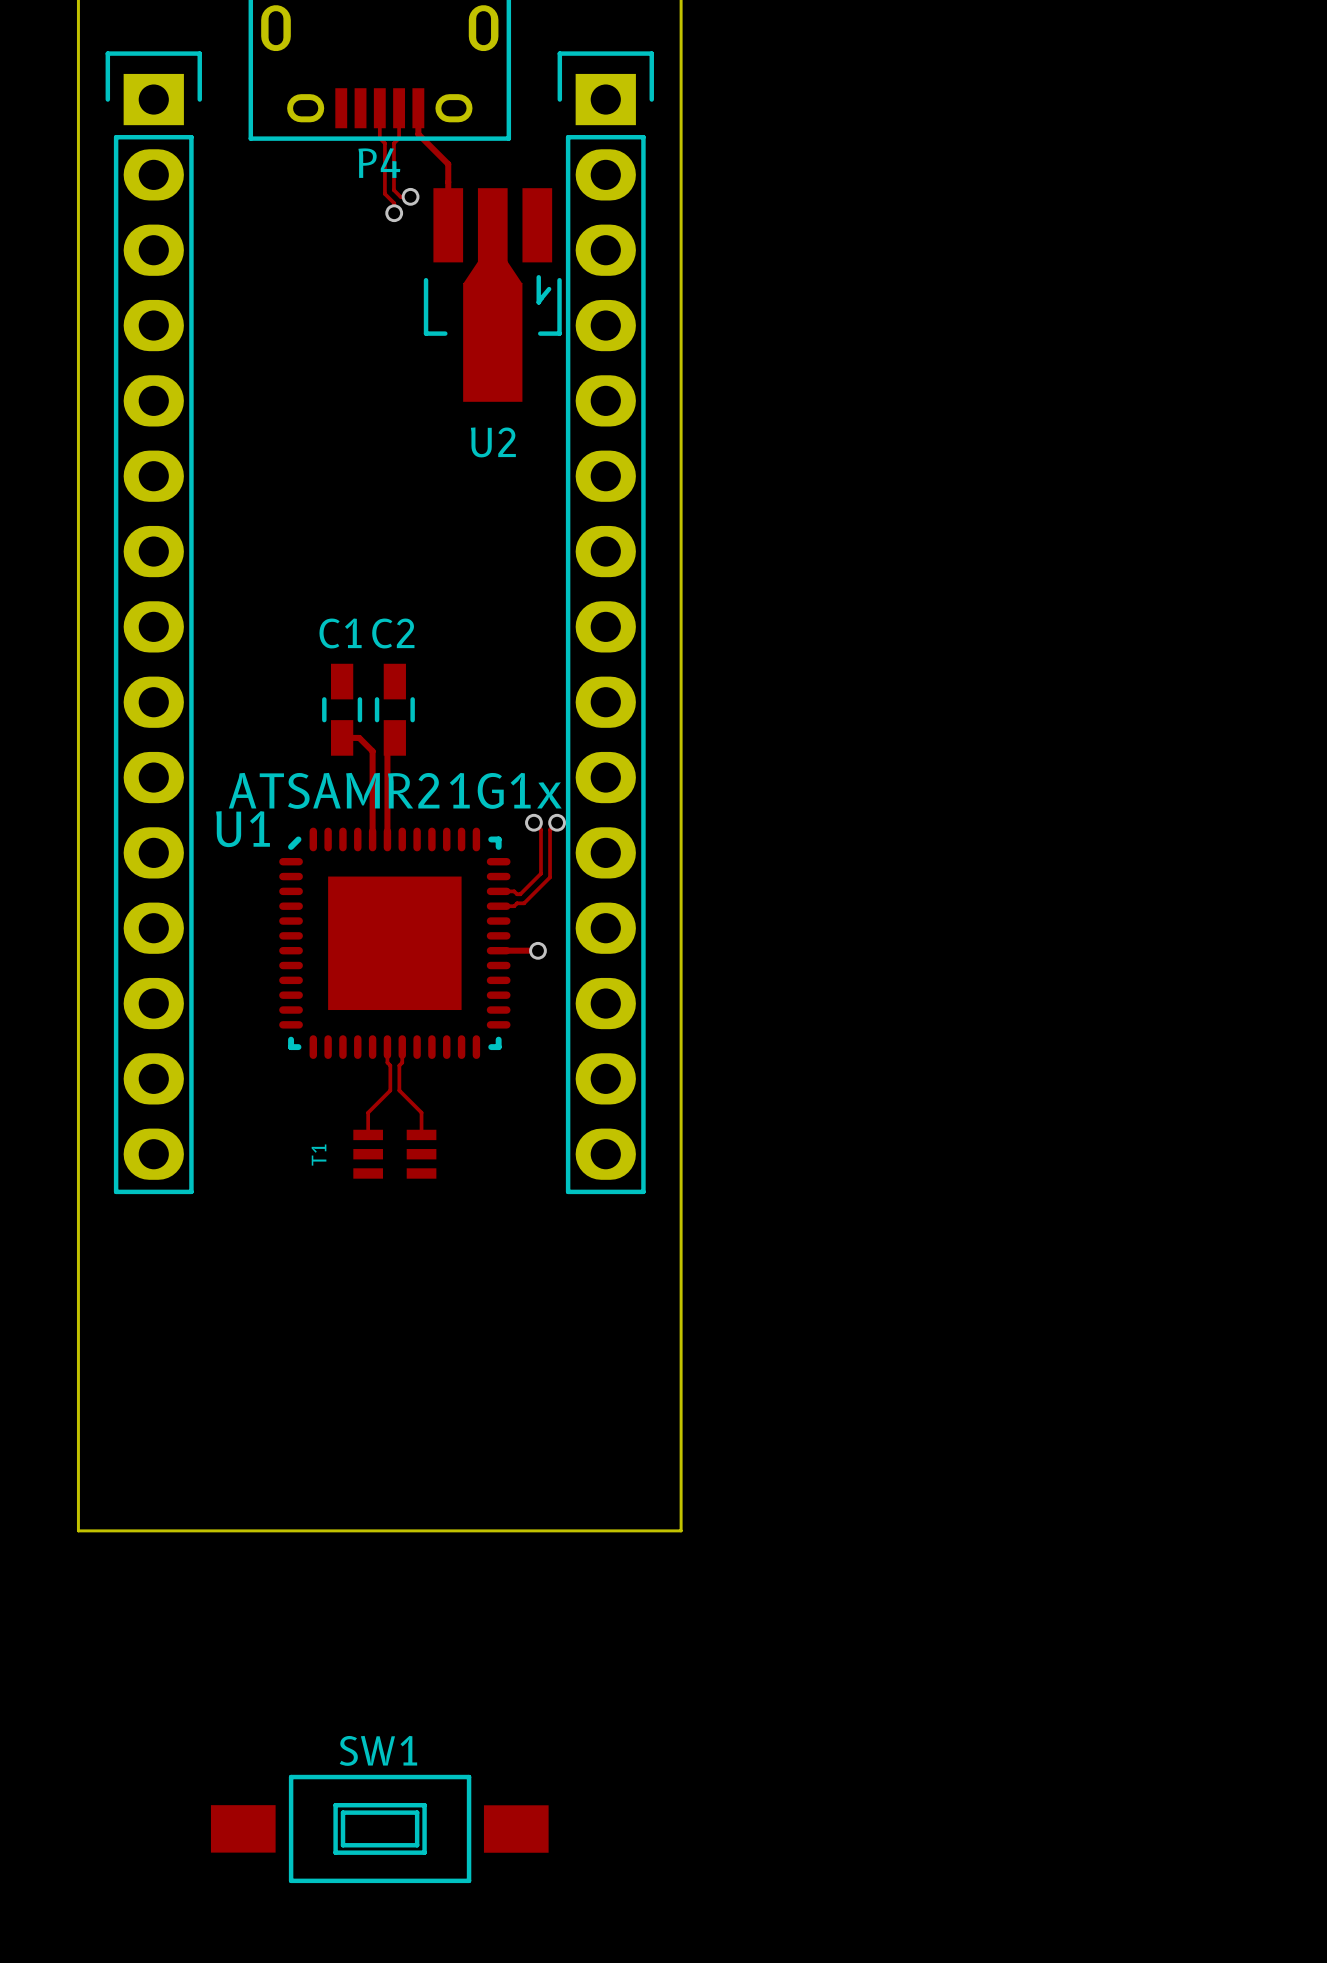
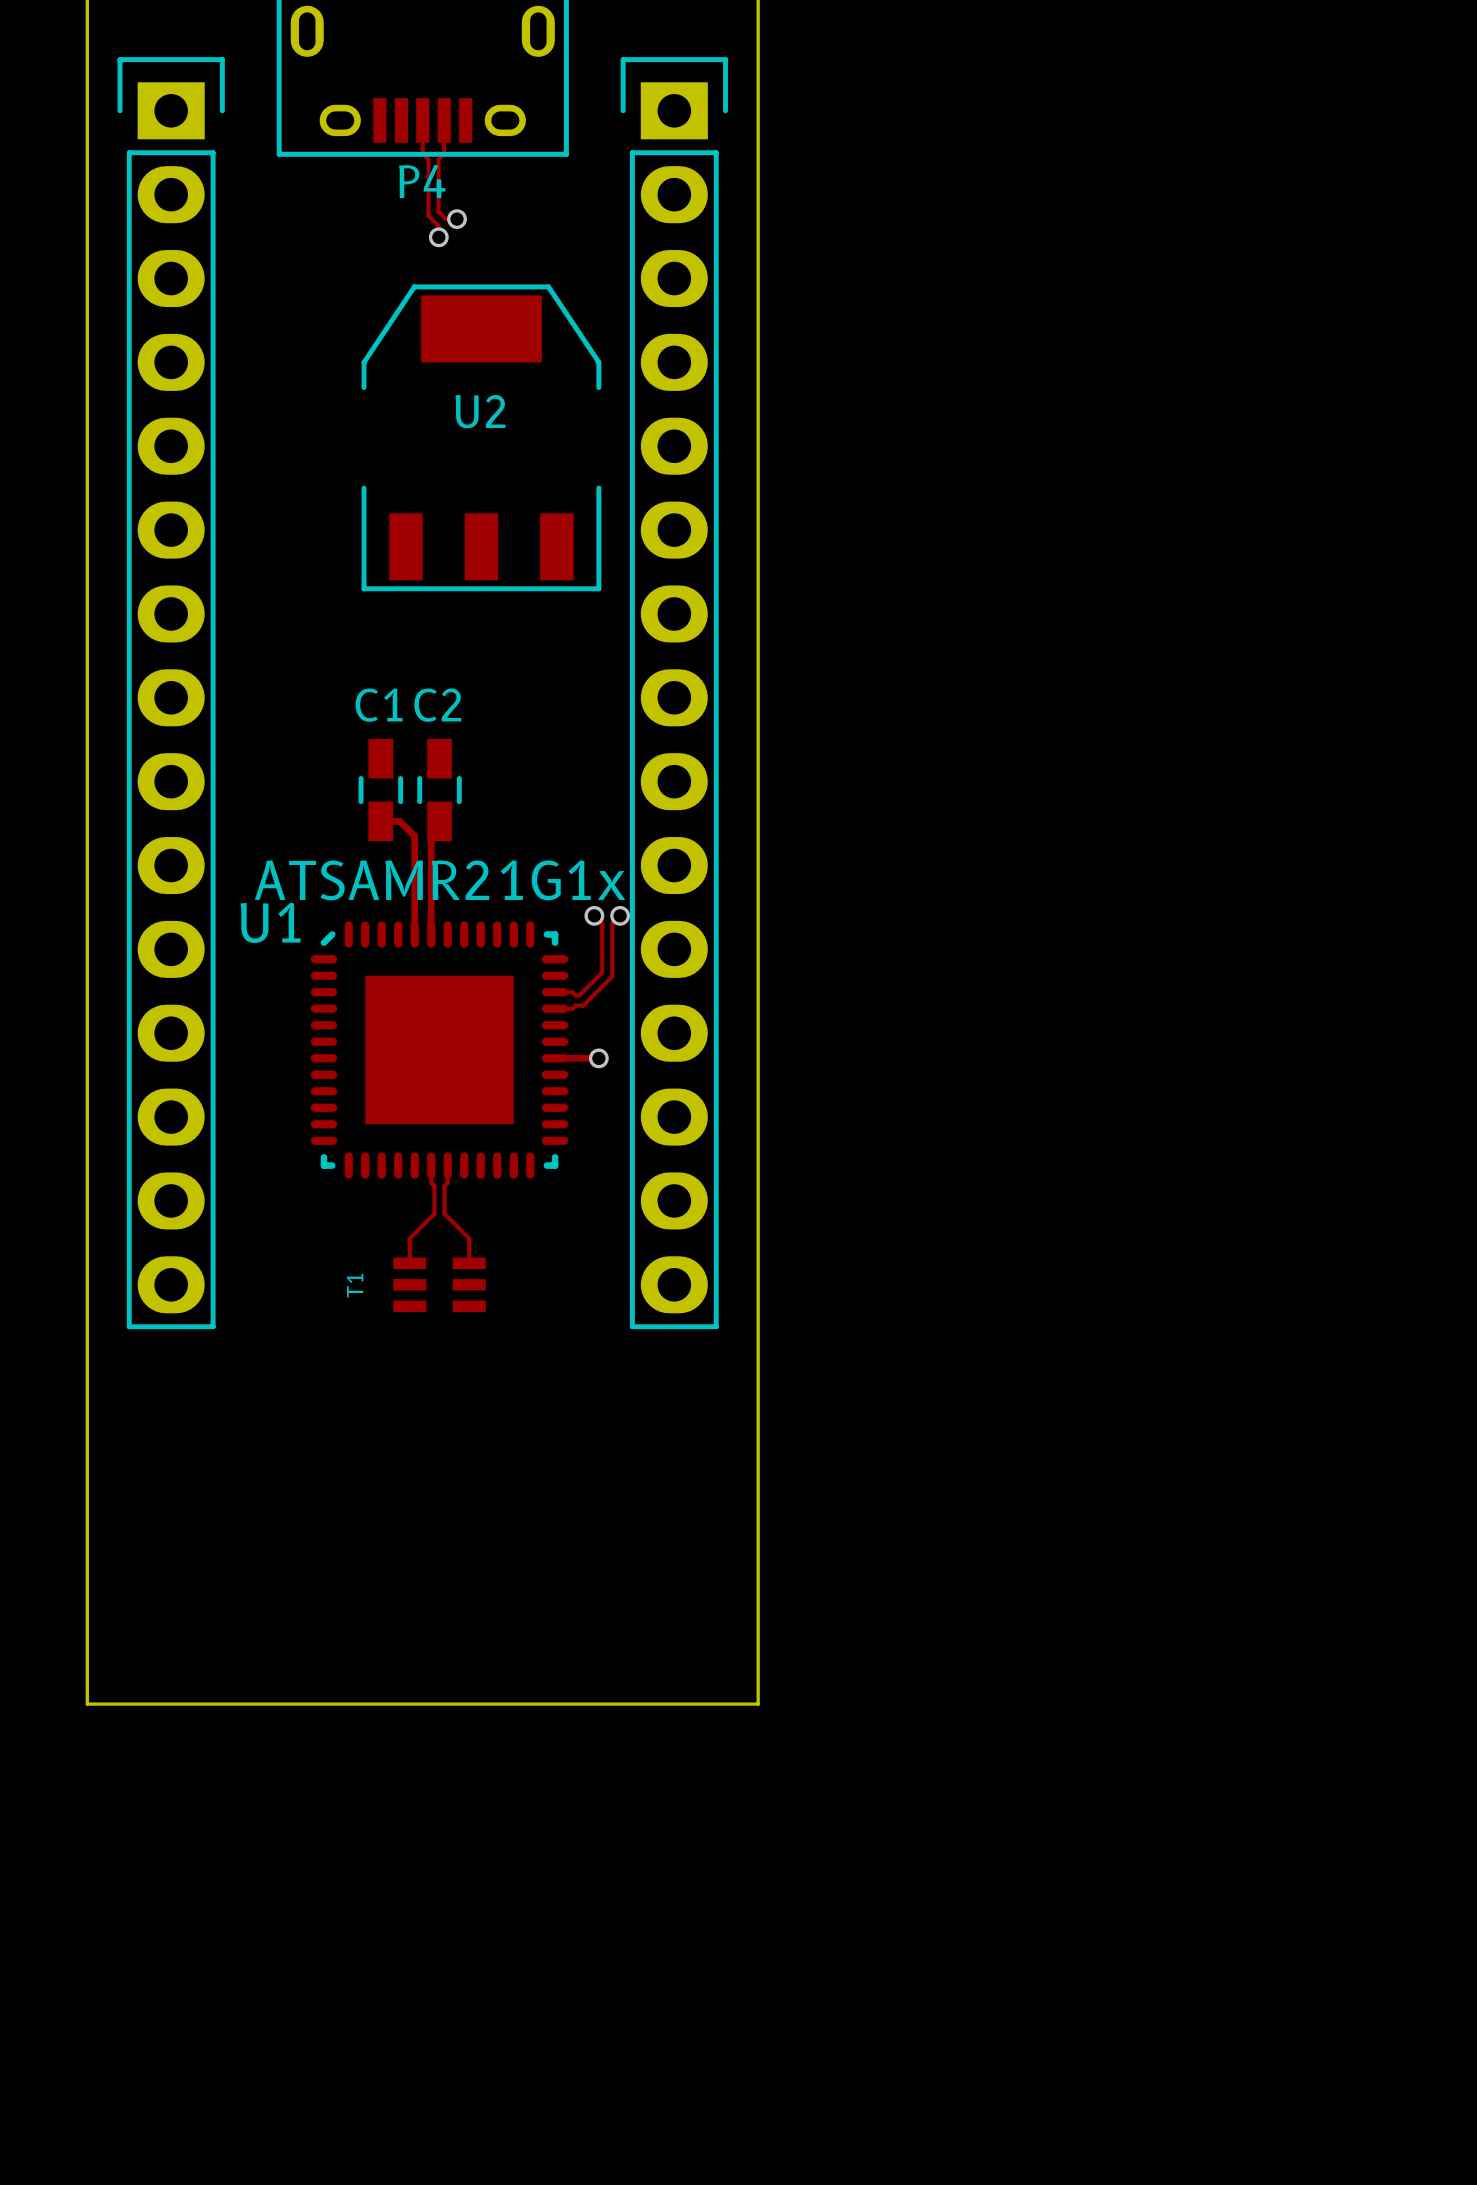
track: (418, 108) (418, 134) (448, 164) (448, 225) -> none
U2 footprint: [423, 188, 562, 402] -> [361, 284, 602, 592]
U2 name position: U2 (493, 442) -> U2 (480, 411)
SW1: (379, 1828) -> none

